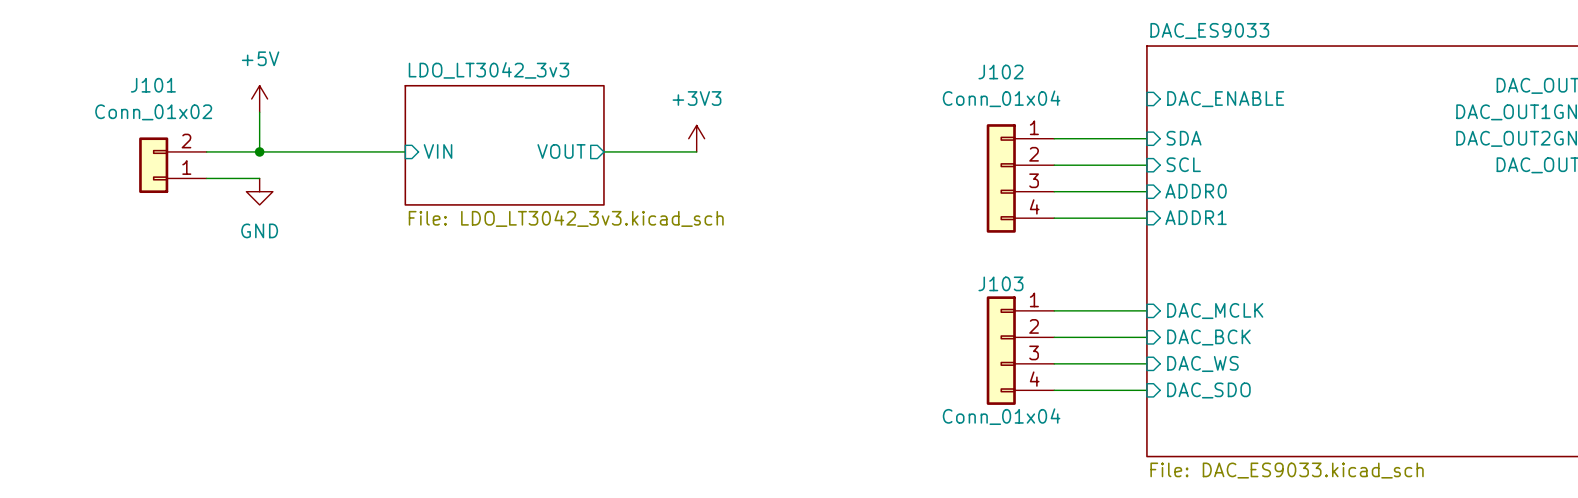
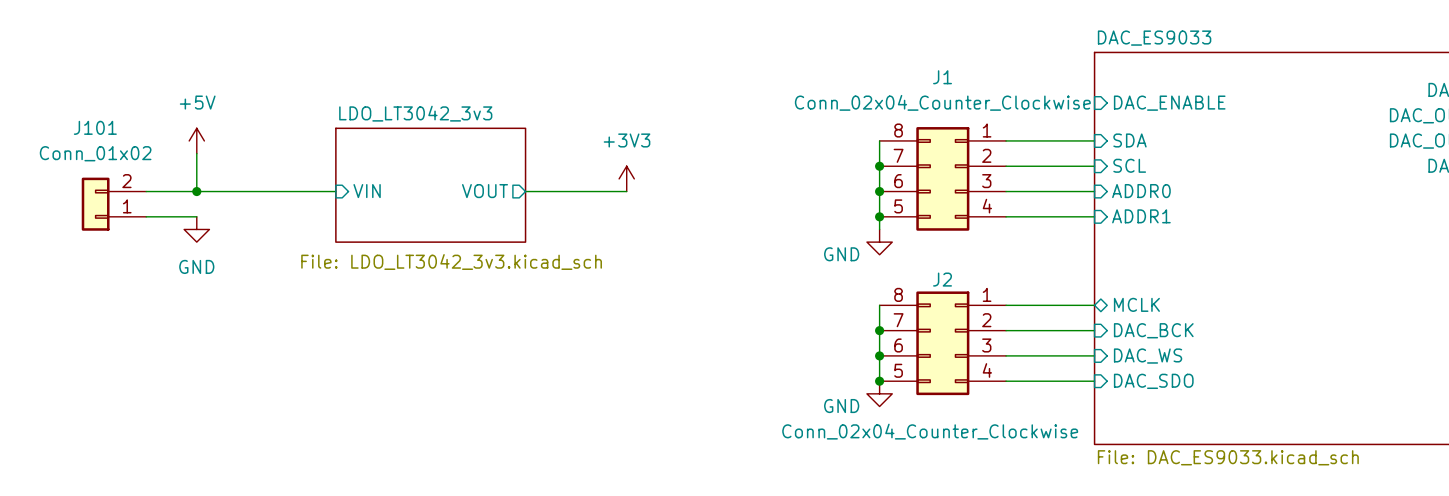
power symbol position: +5V (259, 98) -> +5V (196, 140)
wire: (259, 112) (259, 151) -> none
power symbol position: +3V3 (696, 138) -> +3V3 (626, 178)
wire: none -> (879, 140) (879, 229)
sheet LDO_LT3042_3v3 position: (504, 145) -> (430, 185)
wire: (206, 151) (405, 151) -> (196, 153) (196, 191)
junction: (259, 151) -> none
sheet pin position: VIN (438, 151) -> VIN (367, 191)
sheet pin position: VOUT (561, 151) -> VOUT (485, 191)
wire: (603, 151) (696, 151) -> none
J101 position: (172, 165) -> (113, 204)
junction: none -> (879, 166)
wire: (206, 178) (259, 178) -> (146, 216) (196, 216)
J1: none -> Conn_02x04_Counter_Clockwise (942, 178)
J102: Conn_01x04 (1020, 178) -> none
wire: none -> (146, 191) (335, 191)
junction: none -> (196, 191)
power symbol position: GND (259, 191) -> GND (196, 229)
wire: none -> (525, 191) (626, 191)
junction: none -> (879, 191)
sheet LDO_LT3042_3v3 value position: File: LDO_LT3042_3v3.kicad_sch (566, 218) -> File: LDO_LT3042_3v3.kicad_sch (451, 261)
junction: none -> (879, 216)
power symbol: none -> GND (879, 242)
wire: none -> (879, 305) (879, 381)
sheet pin shape: input (1215, 311) -> bidirectional (1136, 304)
sheet pin: DAC_MCLK (1215, 311) -> MCLK (1136, 304)
junction: none -> (879, 330)
J2: none -> Conn_02x04_Counter_Clockwise (942, 343)
J103: Conn_01x04 (1020, 350) -> none
junction: none -> (879, 355)
junction: none -> (879, 381)
power symbol: none -> GND (879, 393)

